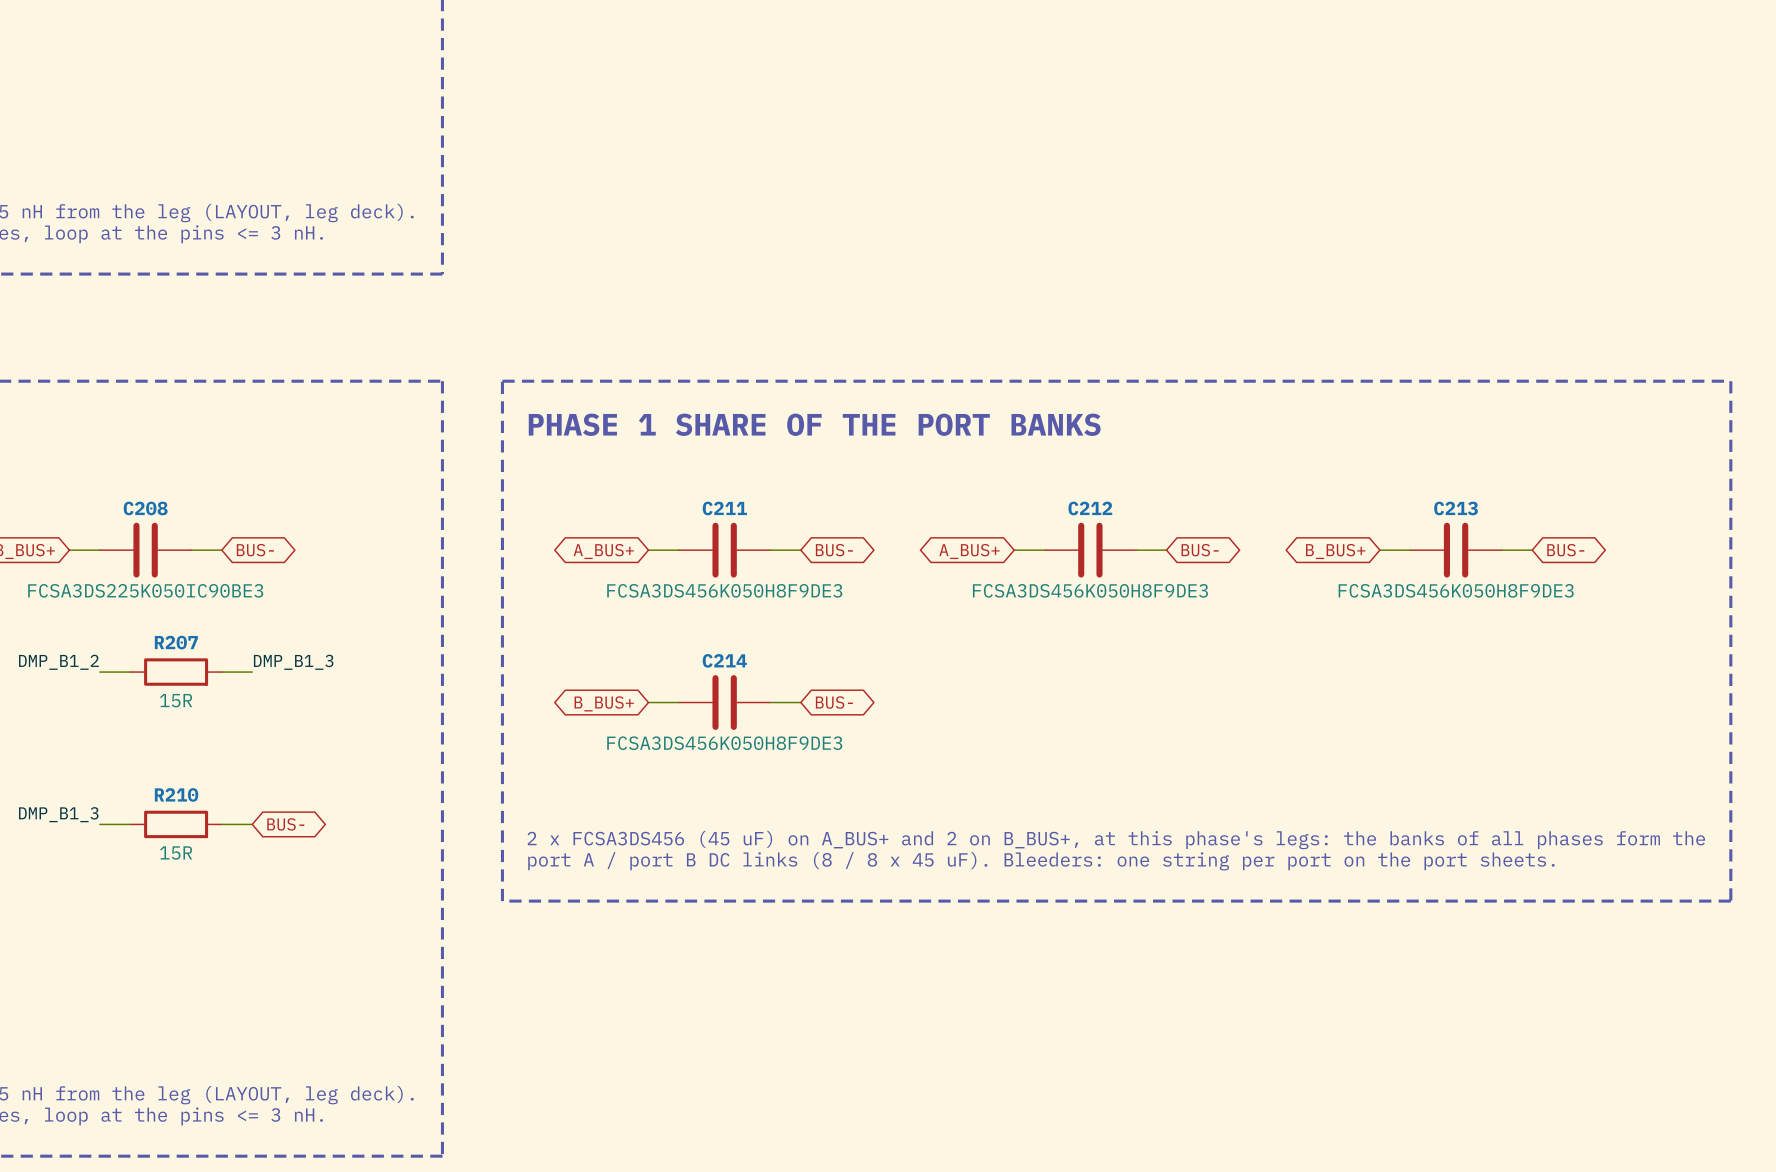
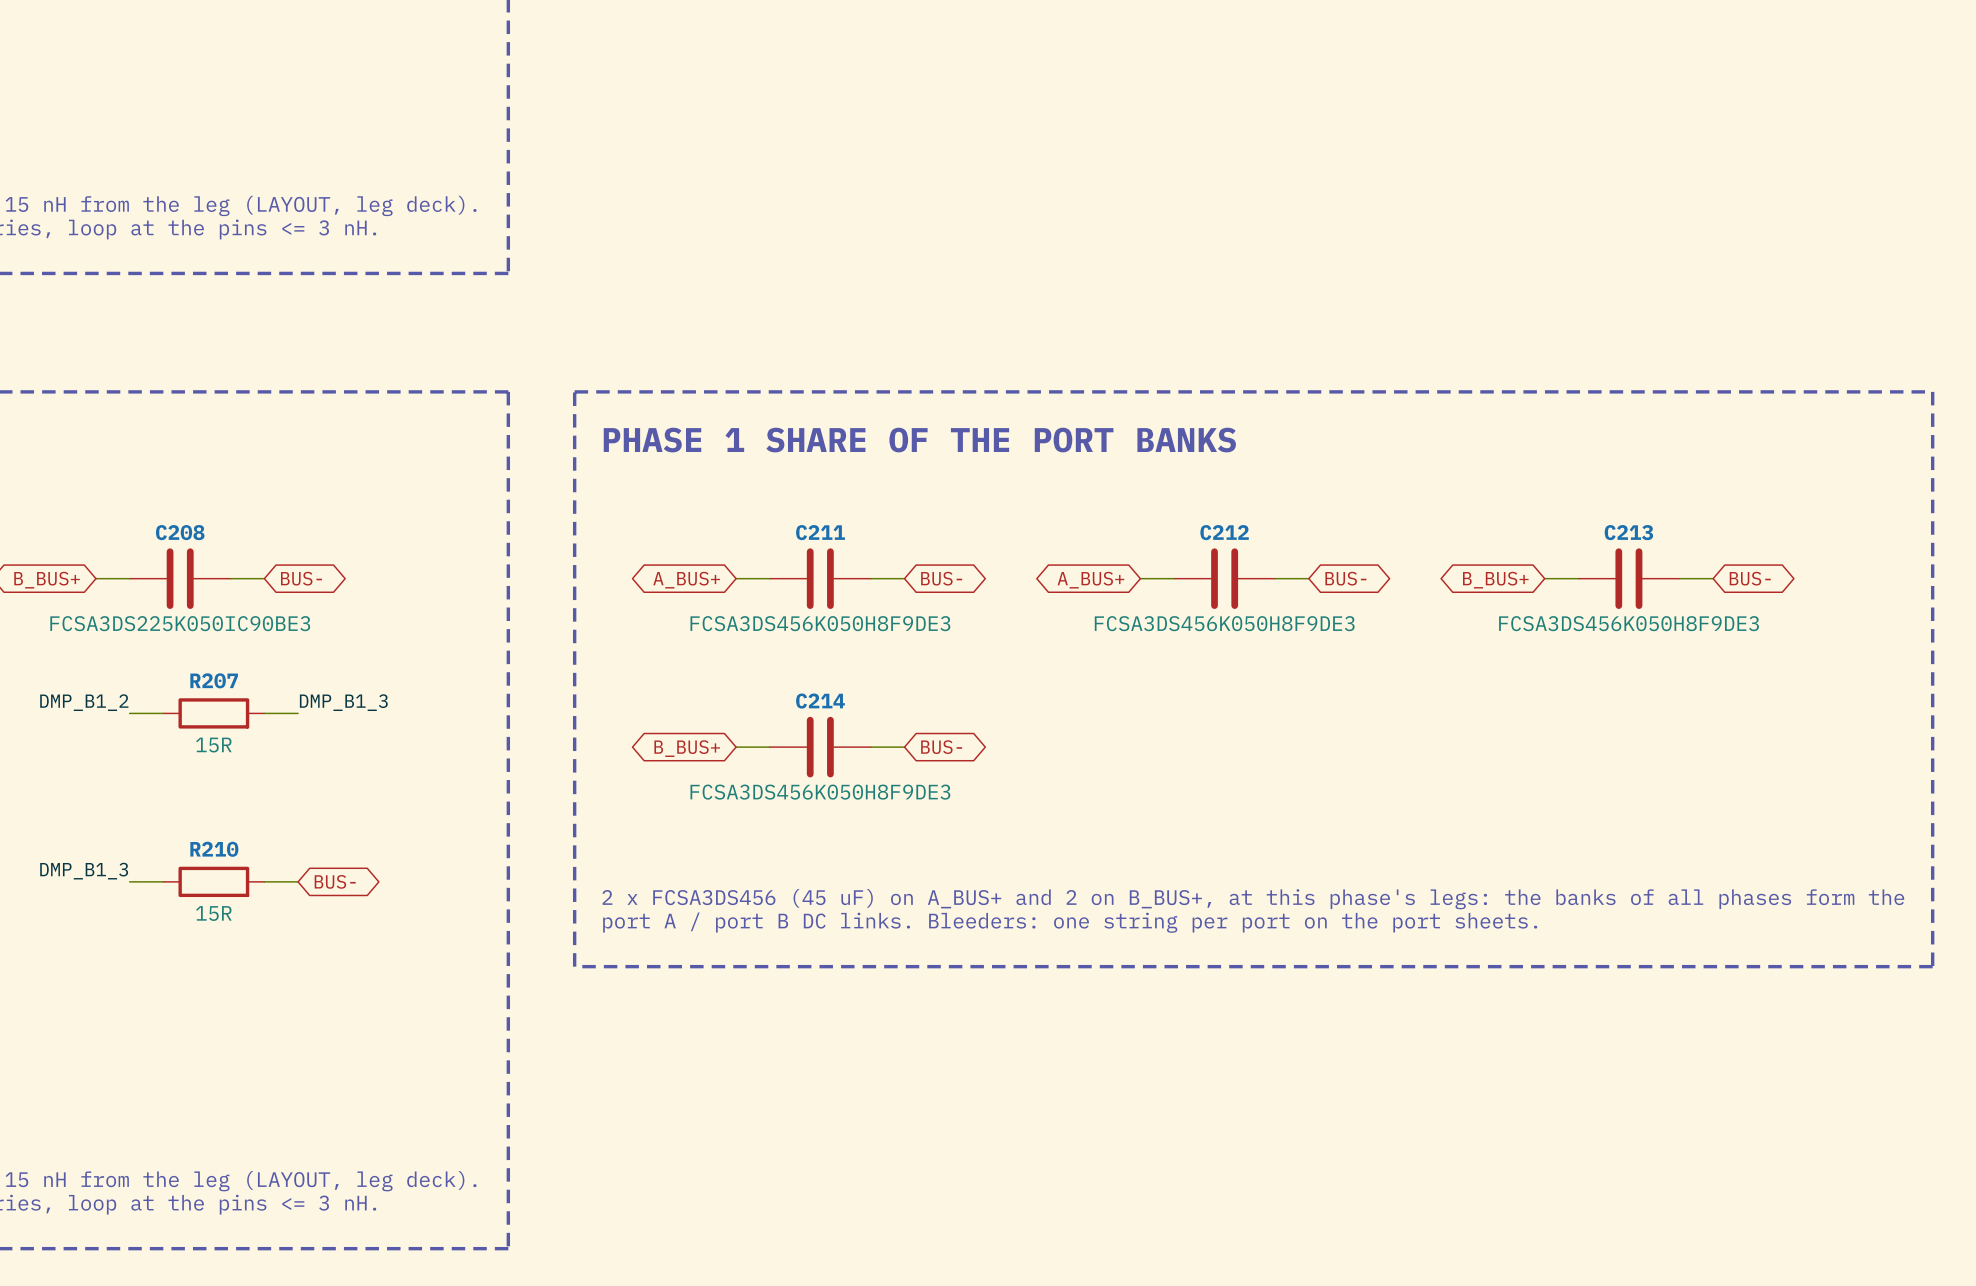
text: port A / port B DC links (8 / 8 x 45 uF). Bleeders: one string per port on the port sheets. (1041, 861) -> port A / port B DC links. Bleeders: one string per port on the port sheets. (1070, 922)

